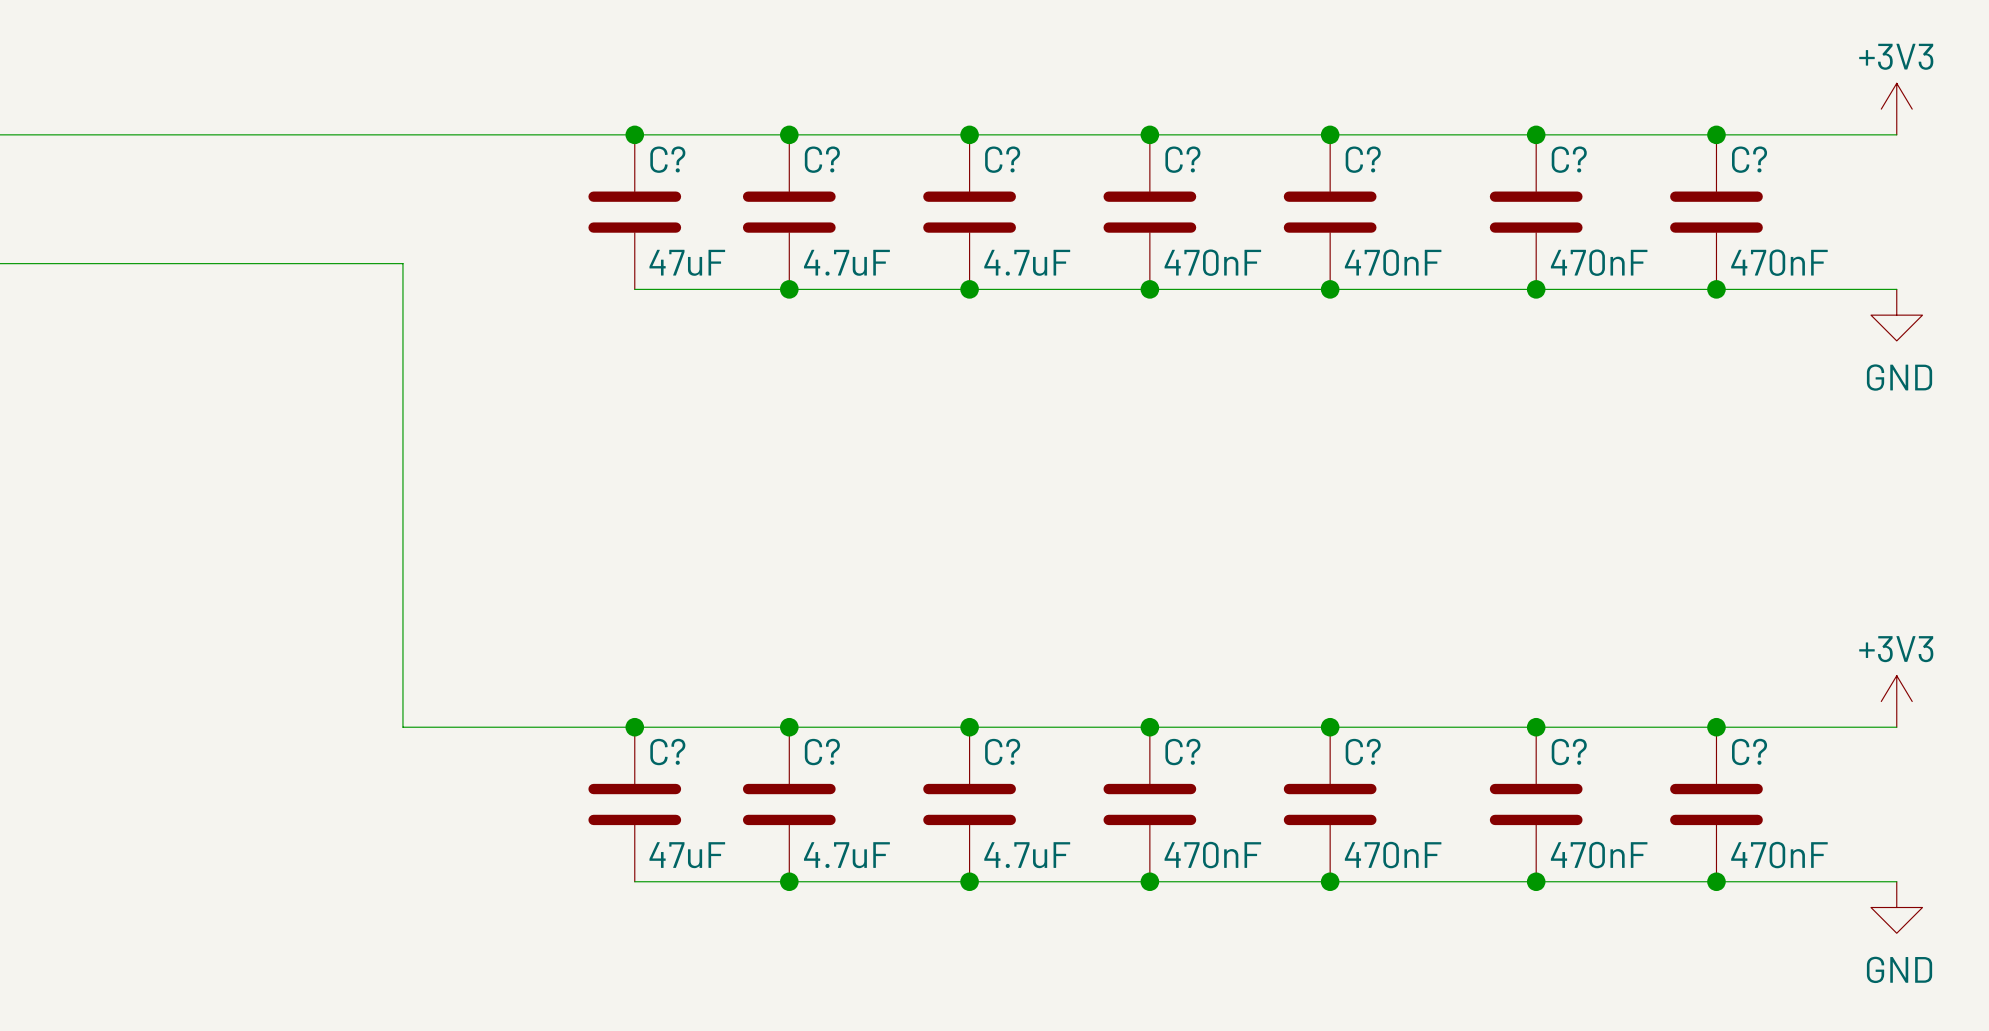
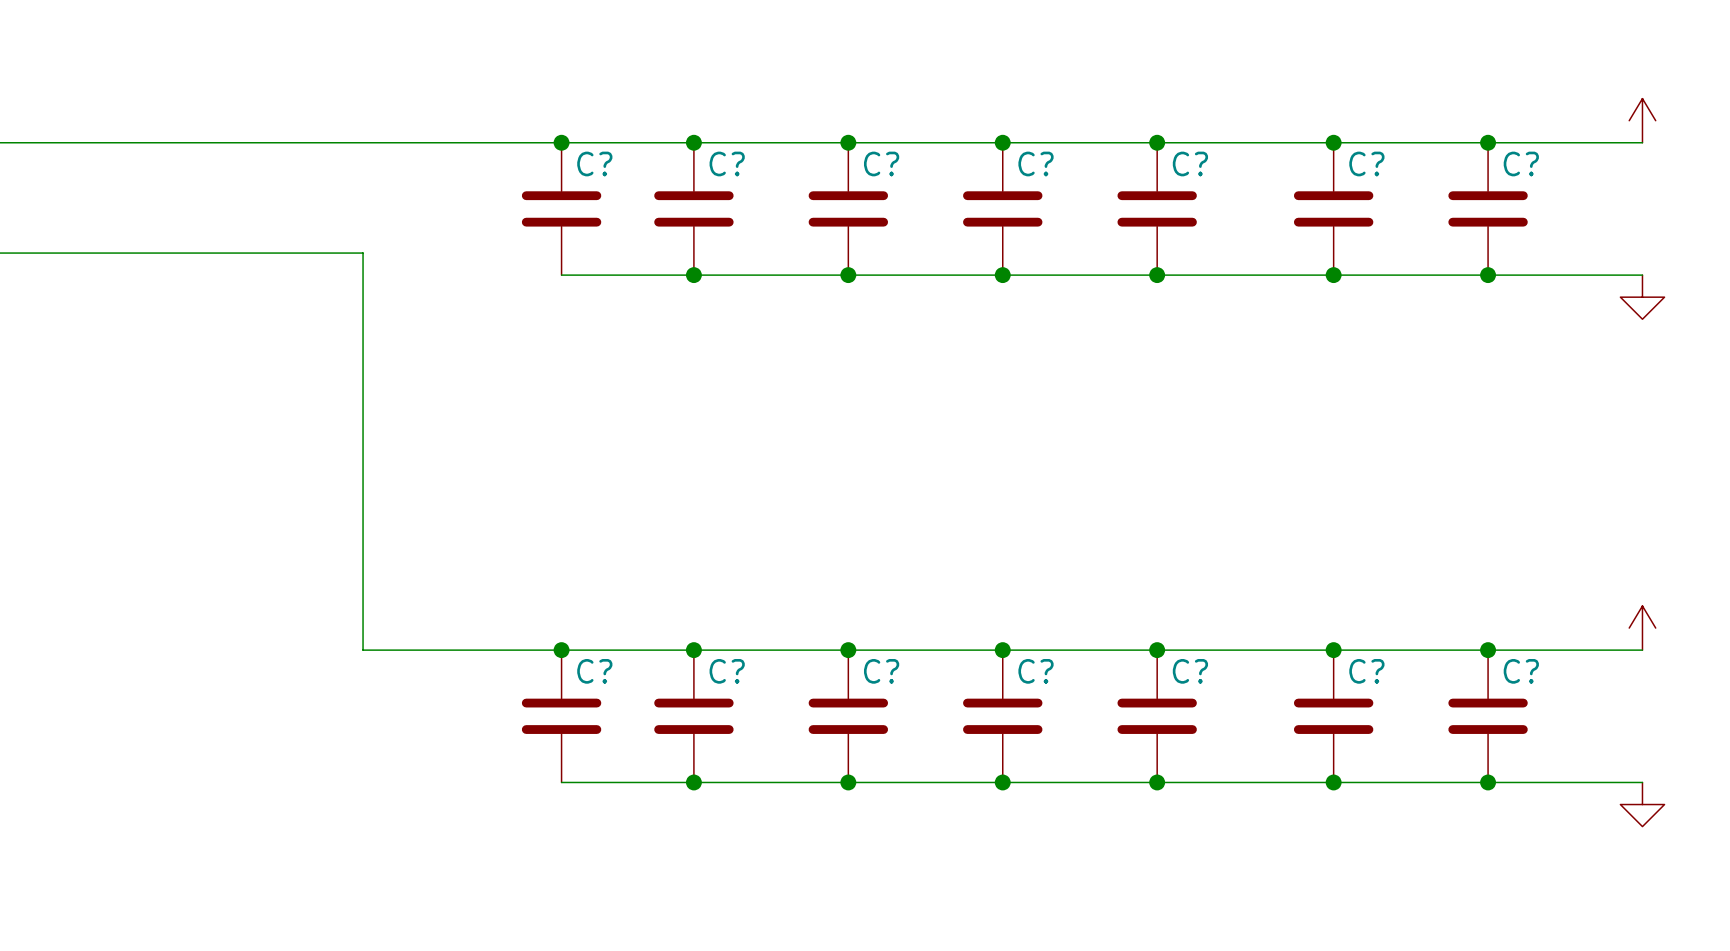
power symbol text: +3V3 (1896, 56) -> none
C? value: 47uF (687, 262) -> none
C? value: 4.7uF (846, 262) -> none
C? value: 4.7uF (1027, 262) -> none
C? value: 470nF (1212, 262) -> none
C? value: 470nF (1393, 262) -> none
C? value: 470nF (1599, 262) -> none
C? value: 470nF (1779, 262) -> none
power symbol text: GND (1899, 377) -> none
power symbol text: +3V3 (1896, 649) -> none
C? value: 47uF (687, 855) -> none
C? value: 4.7uF (846, 855) -> none
C? value: 4.7uF (1027, 855) -> none
C? value: 470nF (1212, 855) -> none
C? value: 470nF (1393, 855) -> none
C? value: 470nF (1599, 855) -> none
C? value: 470nF (1779, 855) -> none
power symbol text: GND (1899, 969) -> none

